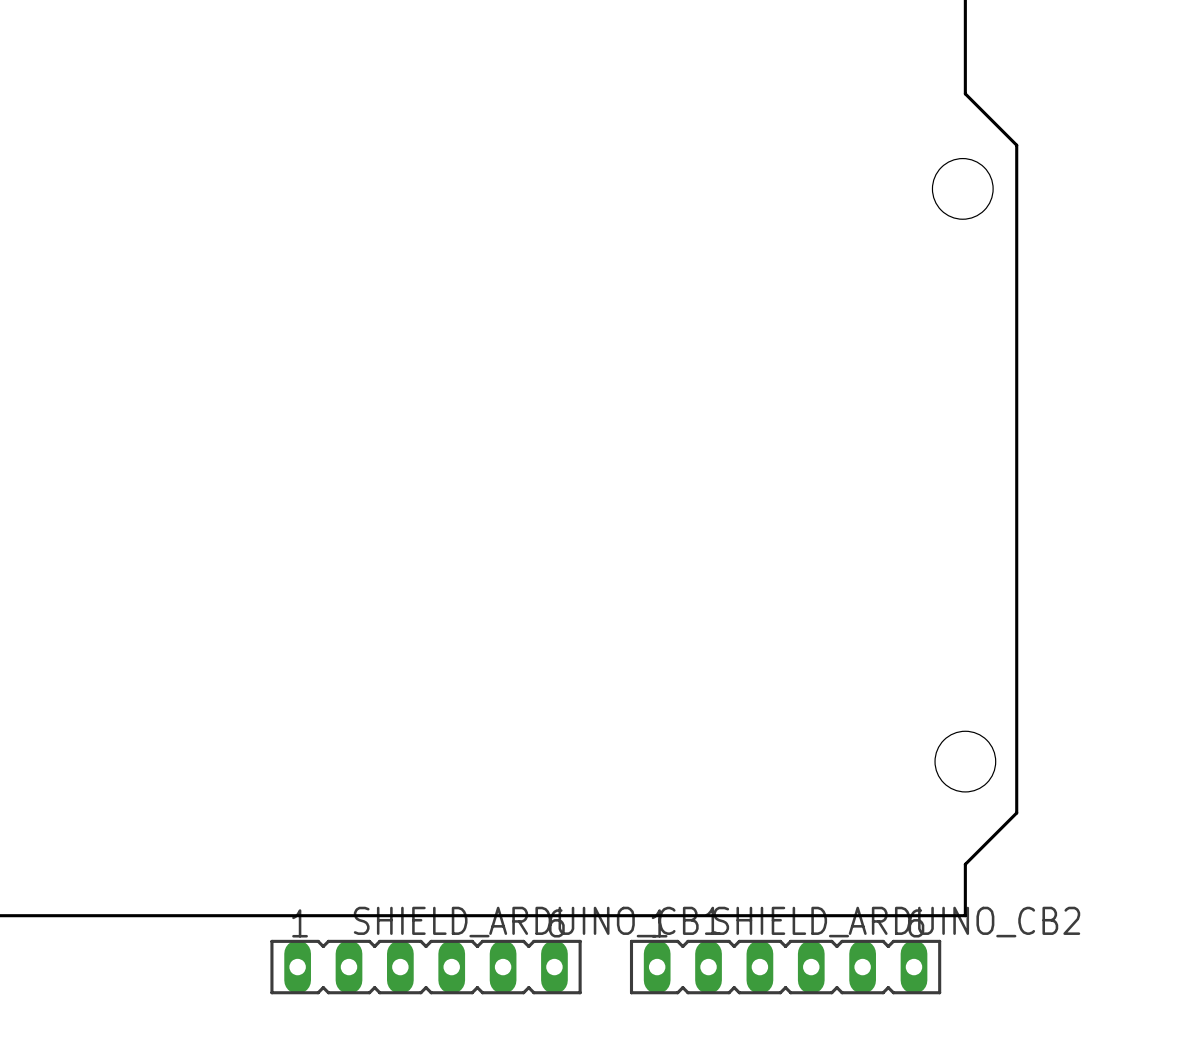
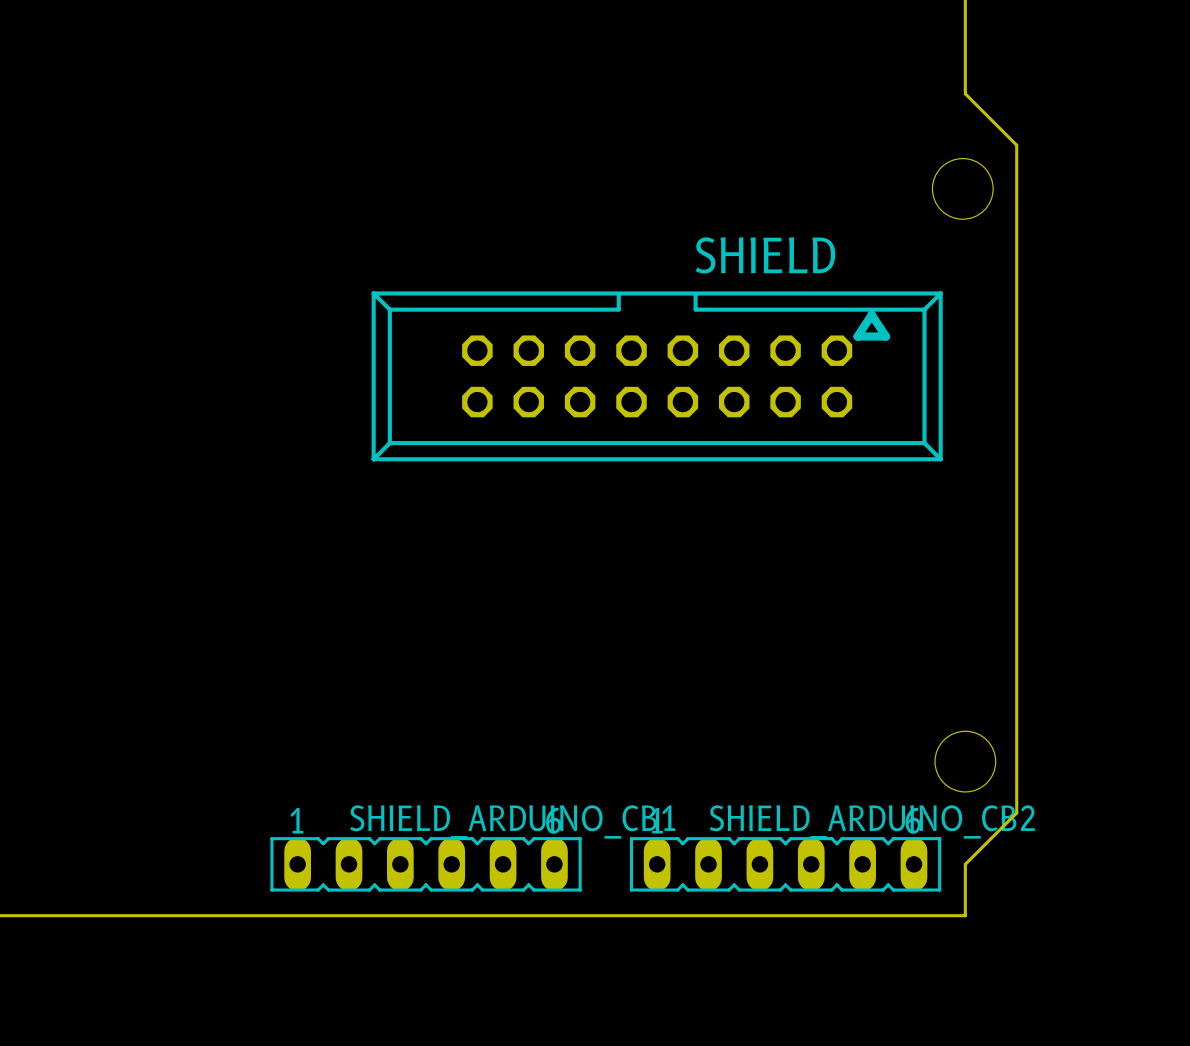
SHIELD: none -> (657, 376)
SHIELD_ARDUINO_CB1 position: (426, 967) -> (426, 864)
SHIELD_ARDUINO_CB2 position: (785, 967) -> (785, 864)

